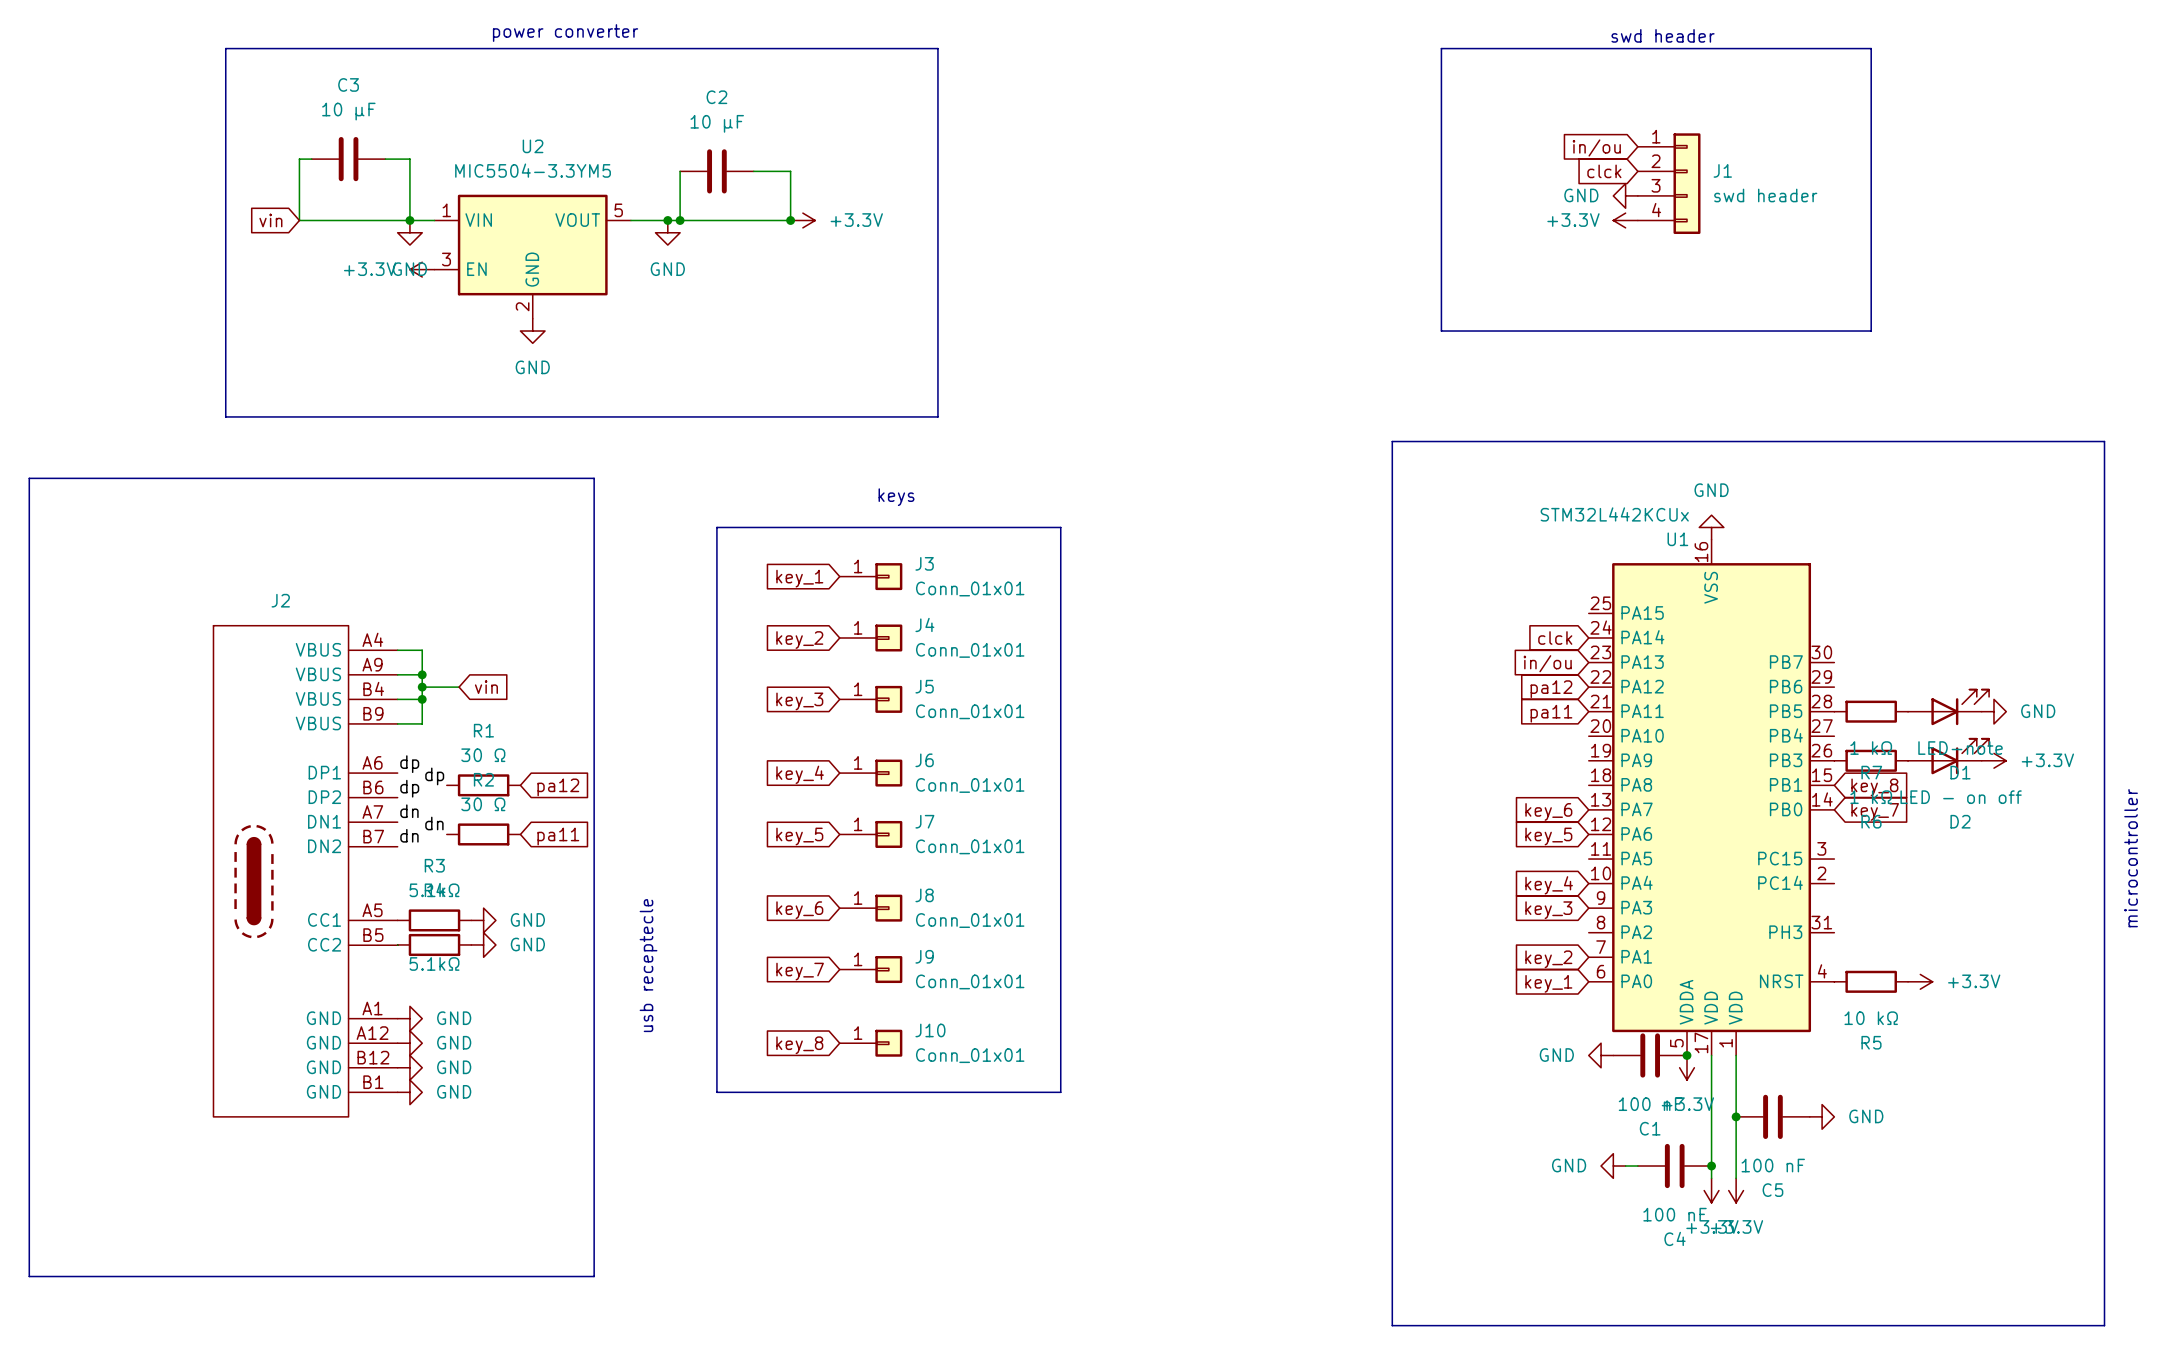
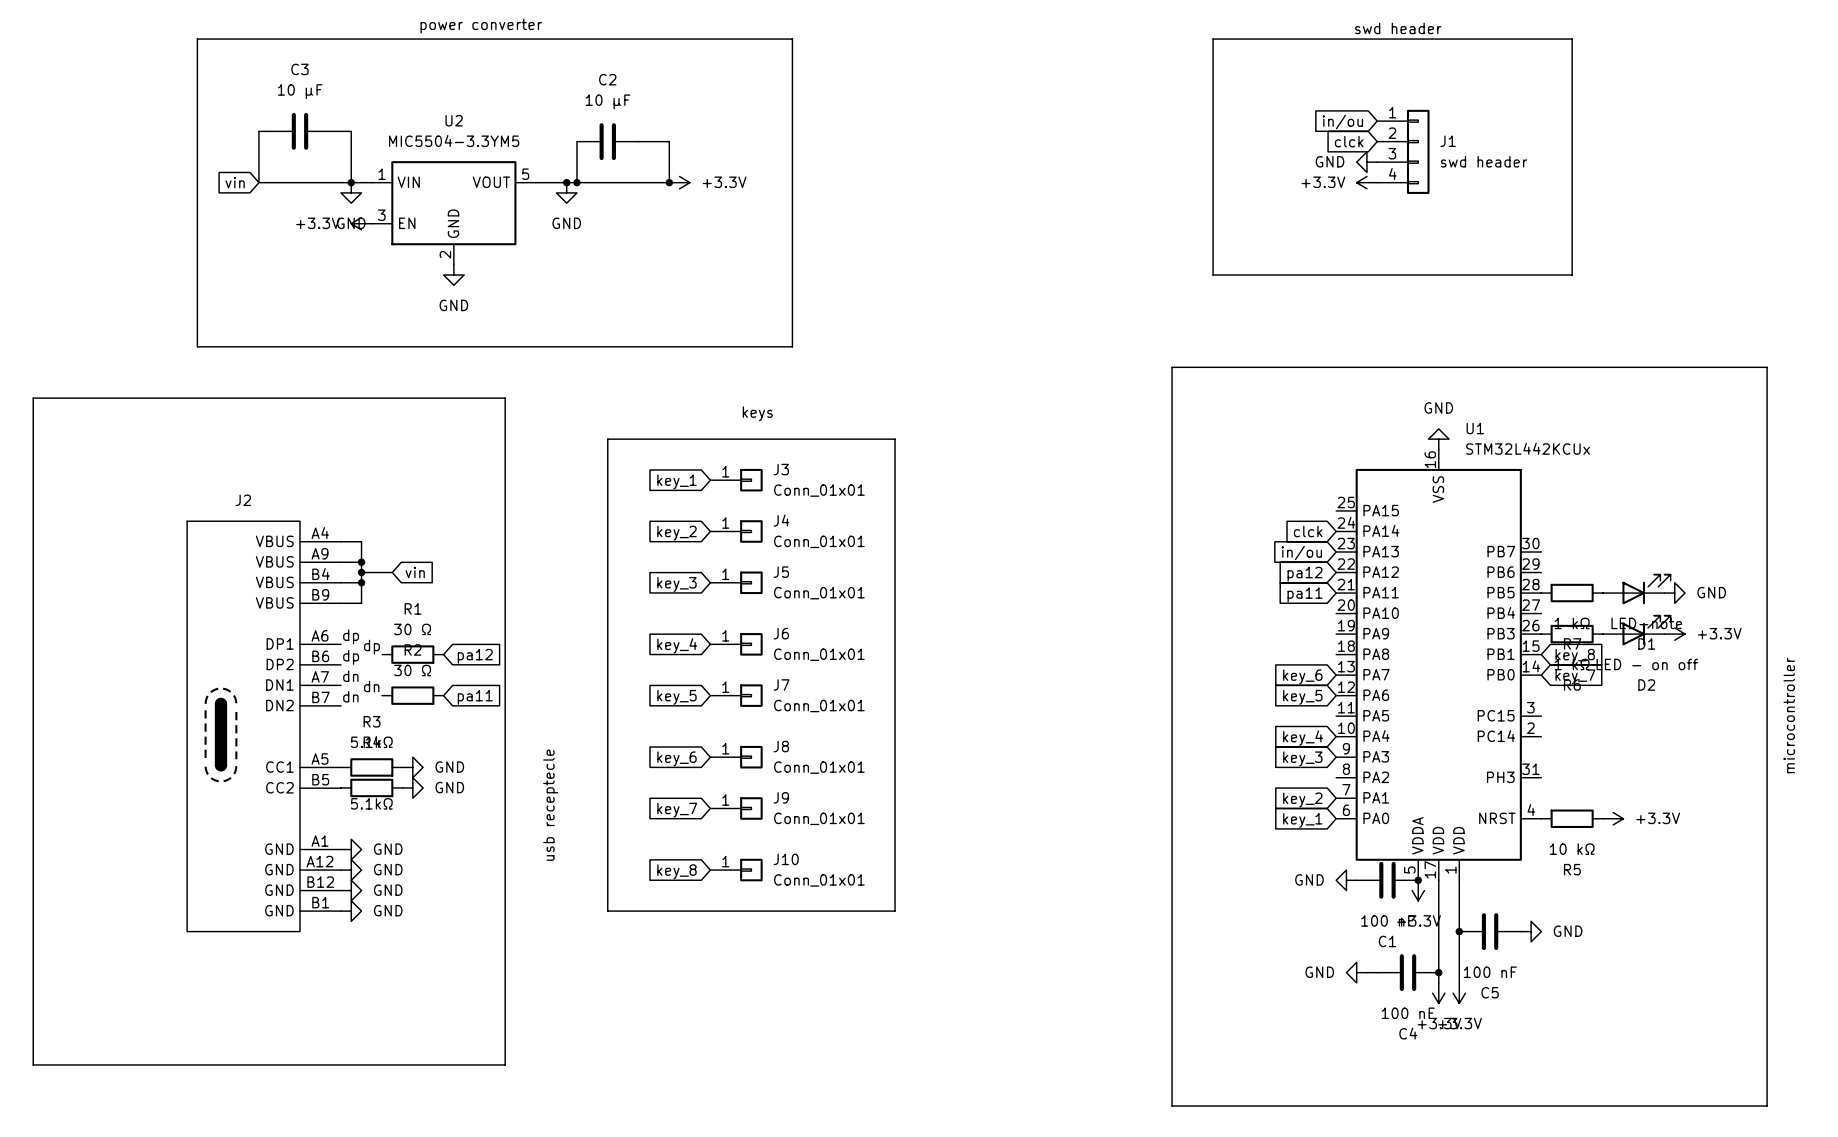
U1 value position: STM32L442KCUx (1614, 514) -> STM32L442KCUx (1528, 448)
U1 name position: U1 (1677, 539) -> U1 (1475, 428)

